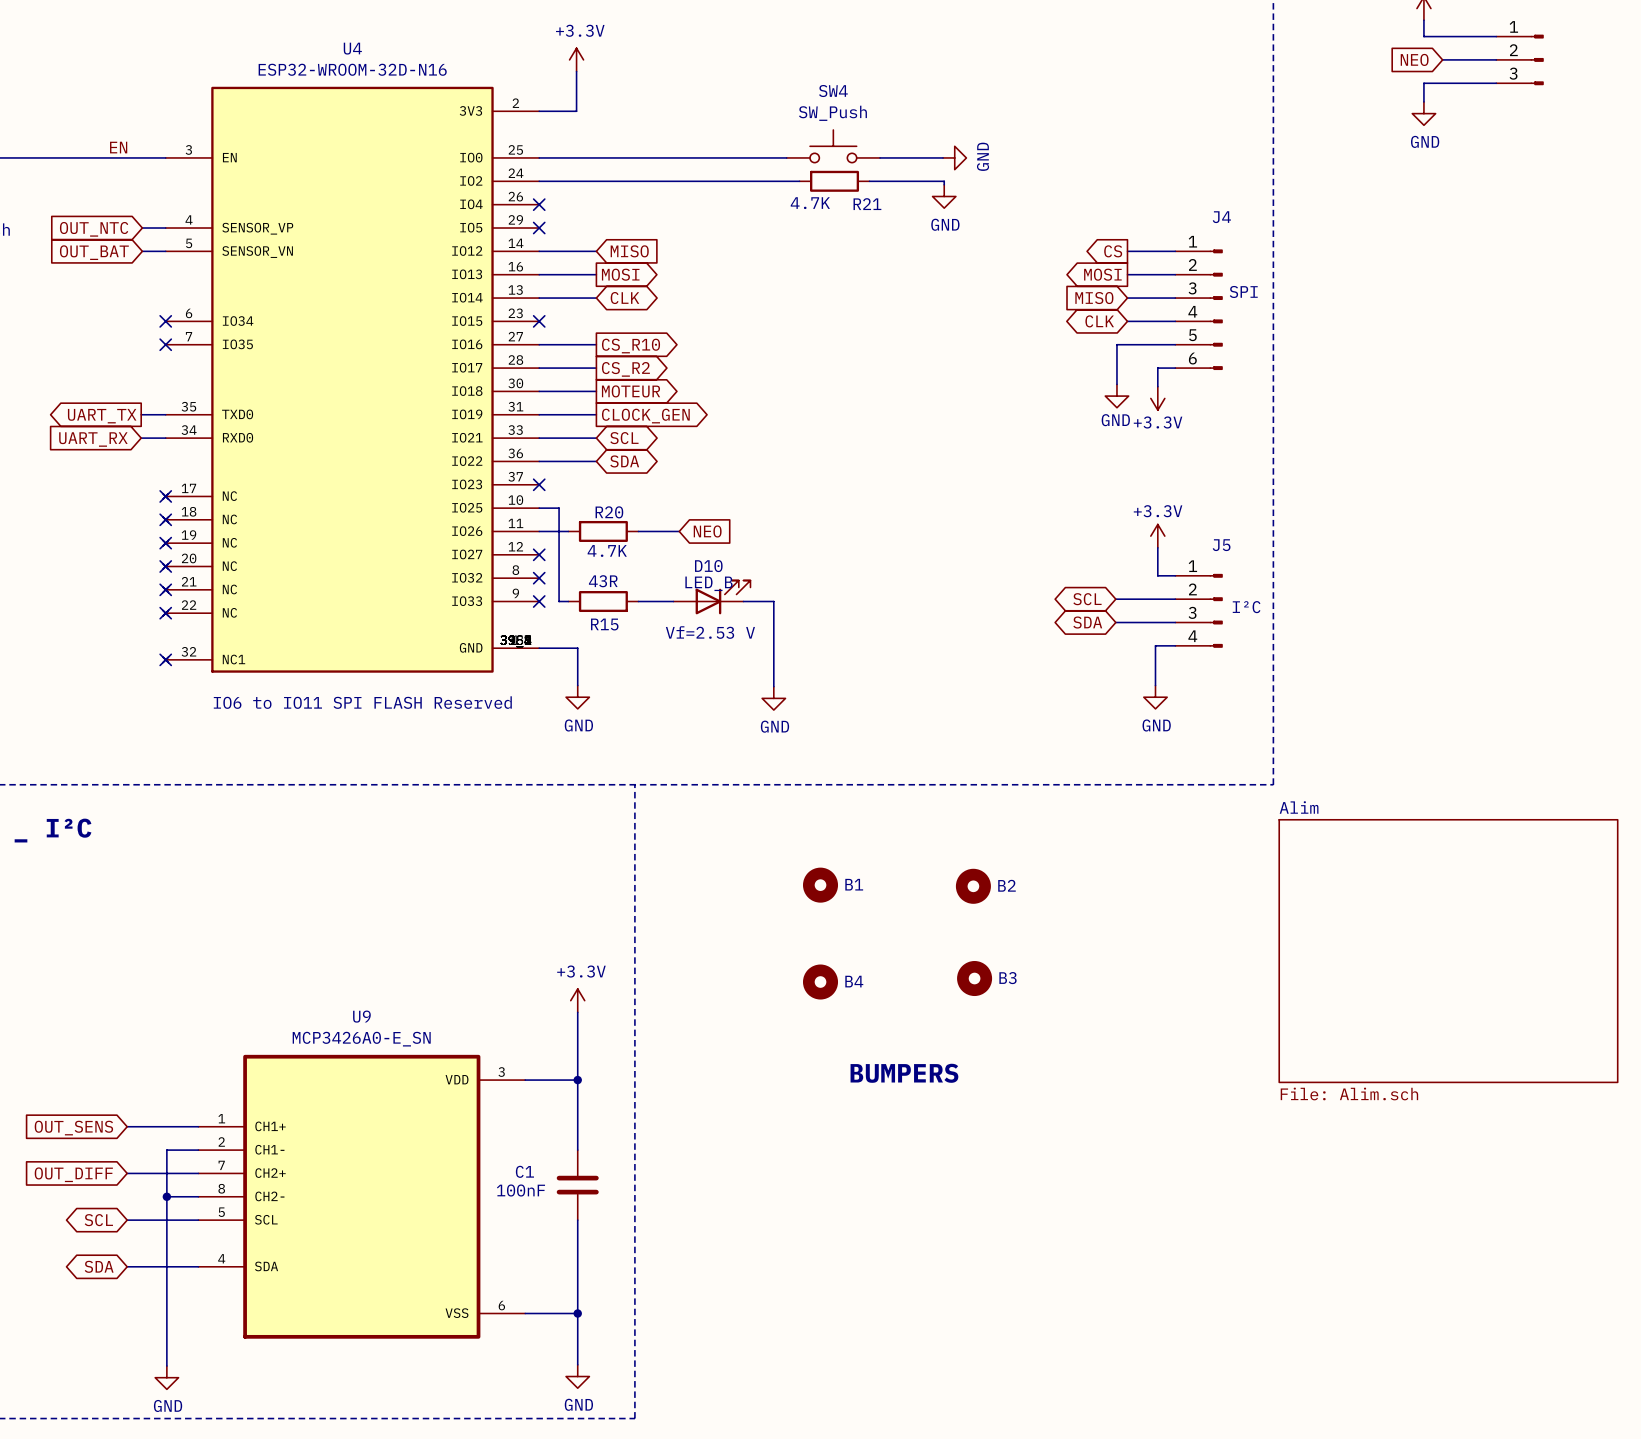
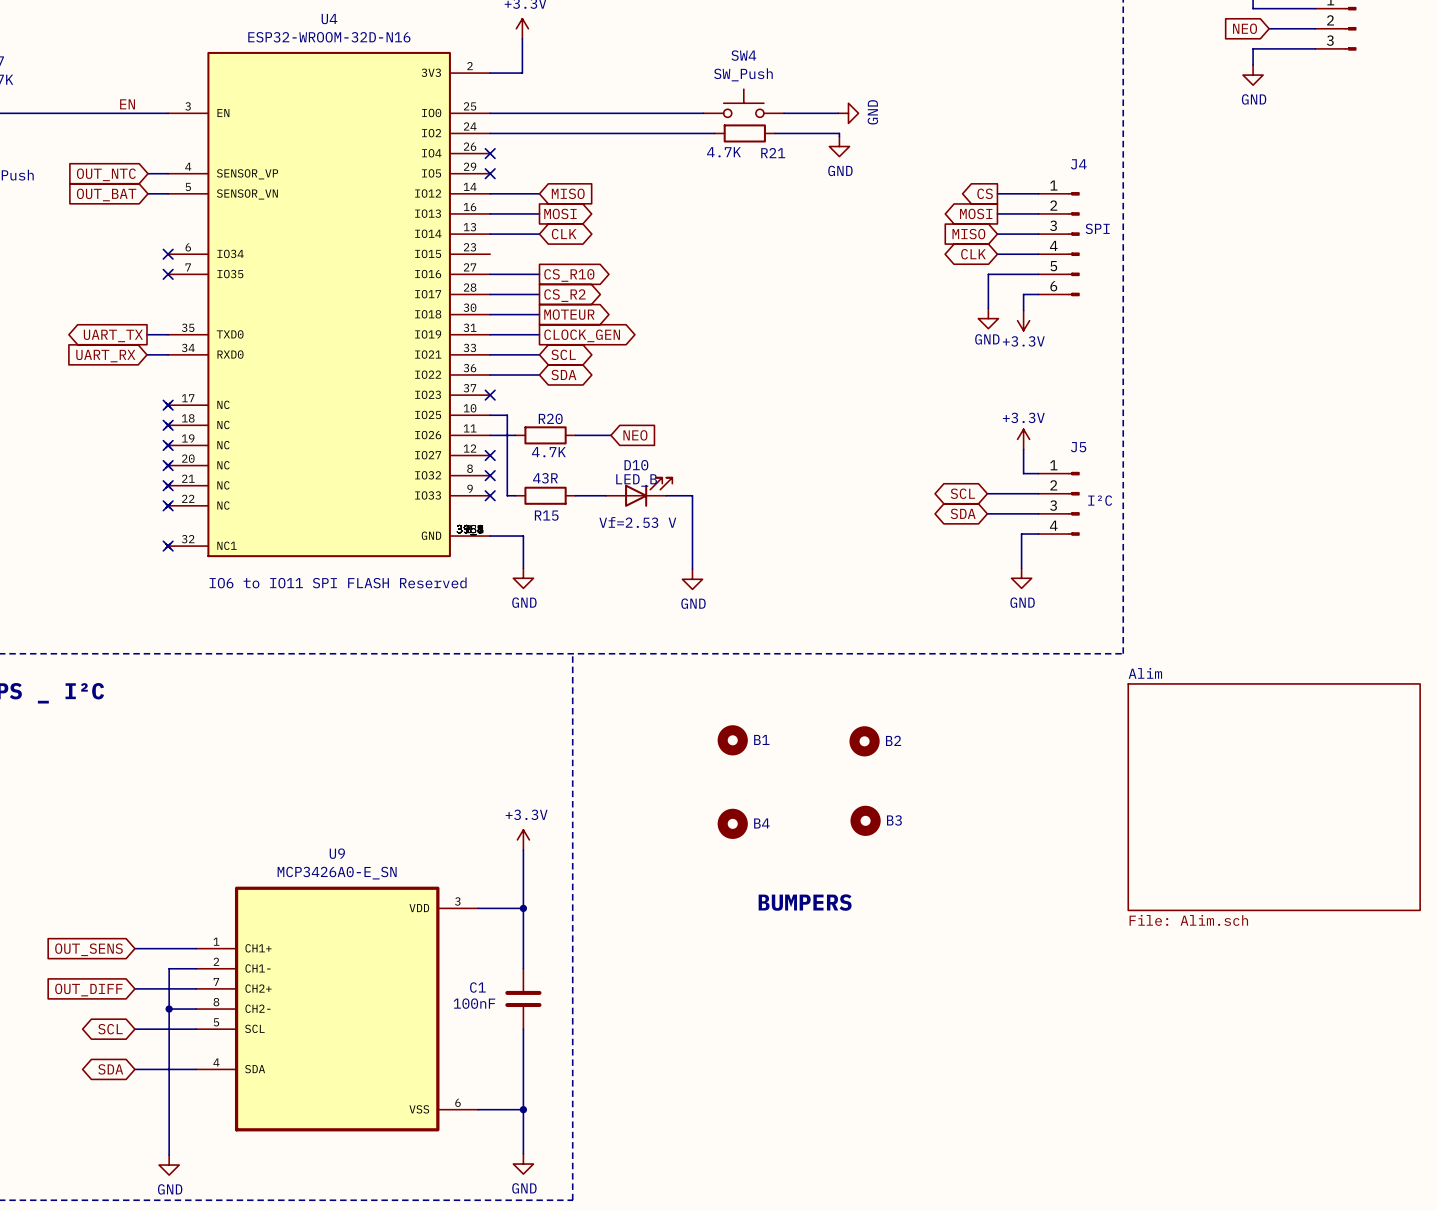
no-connect mark: (539, 321) -> none

